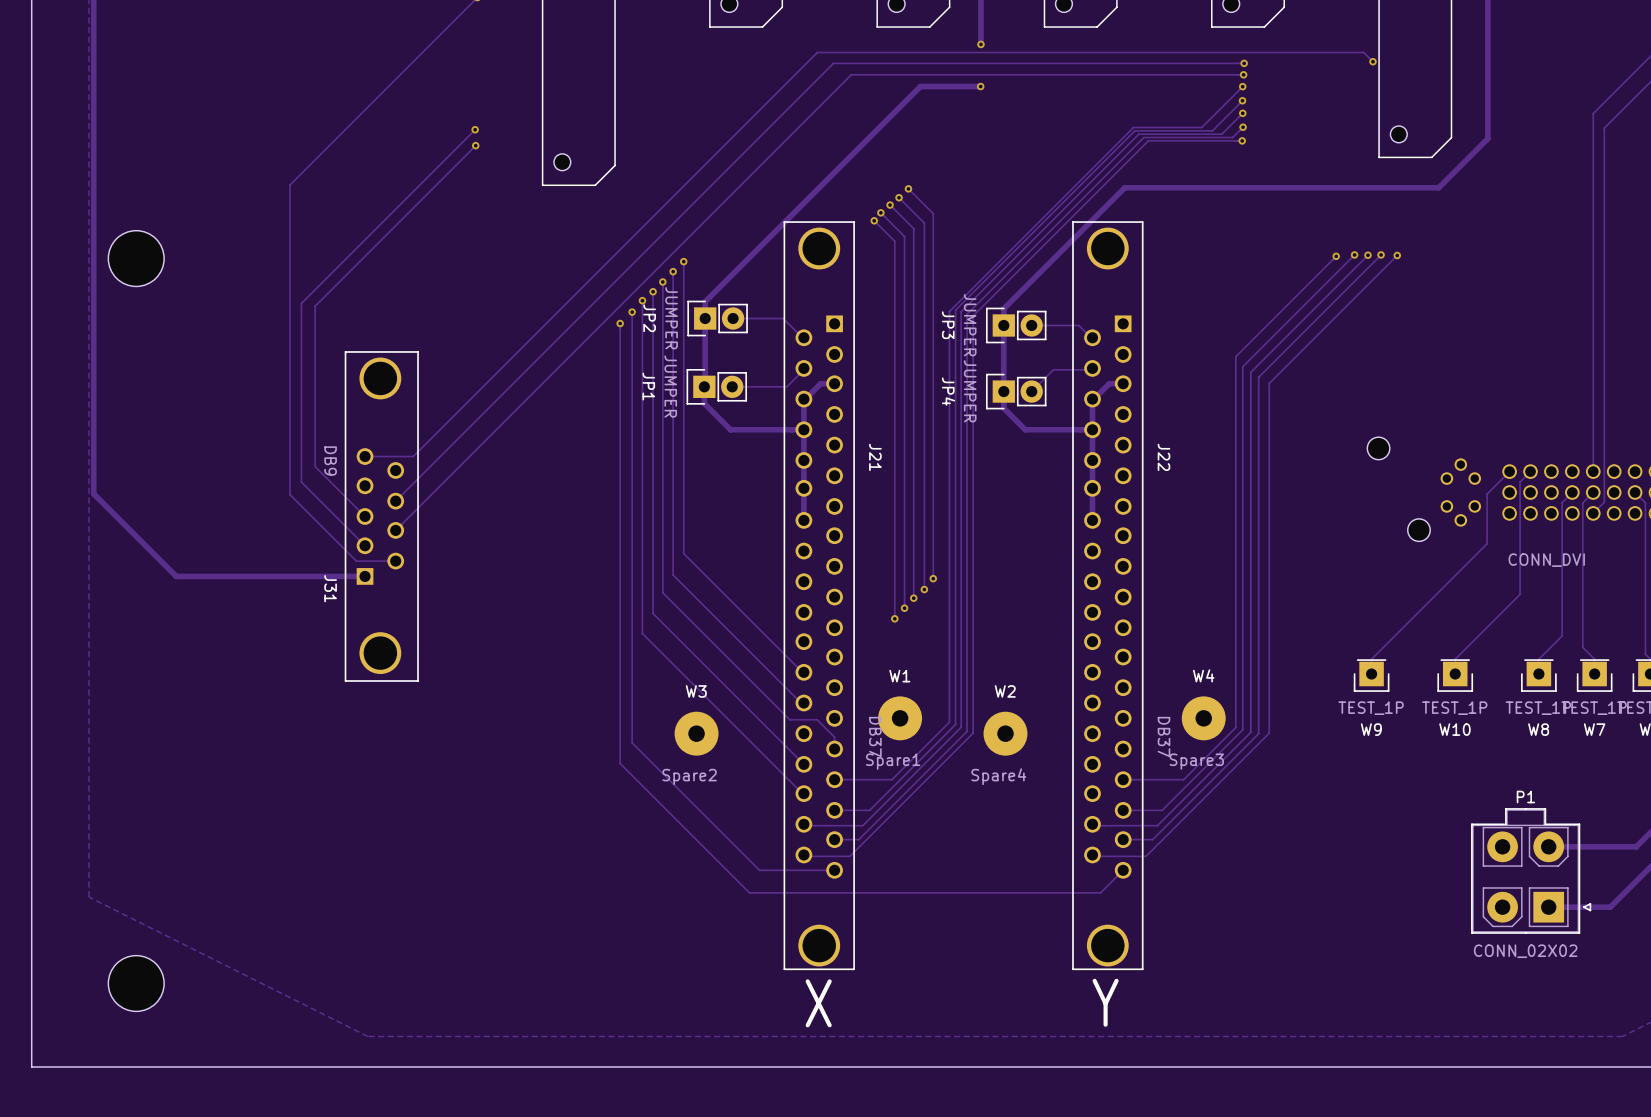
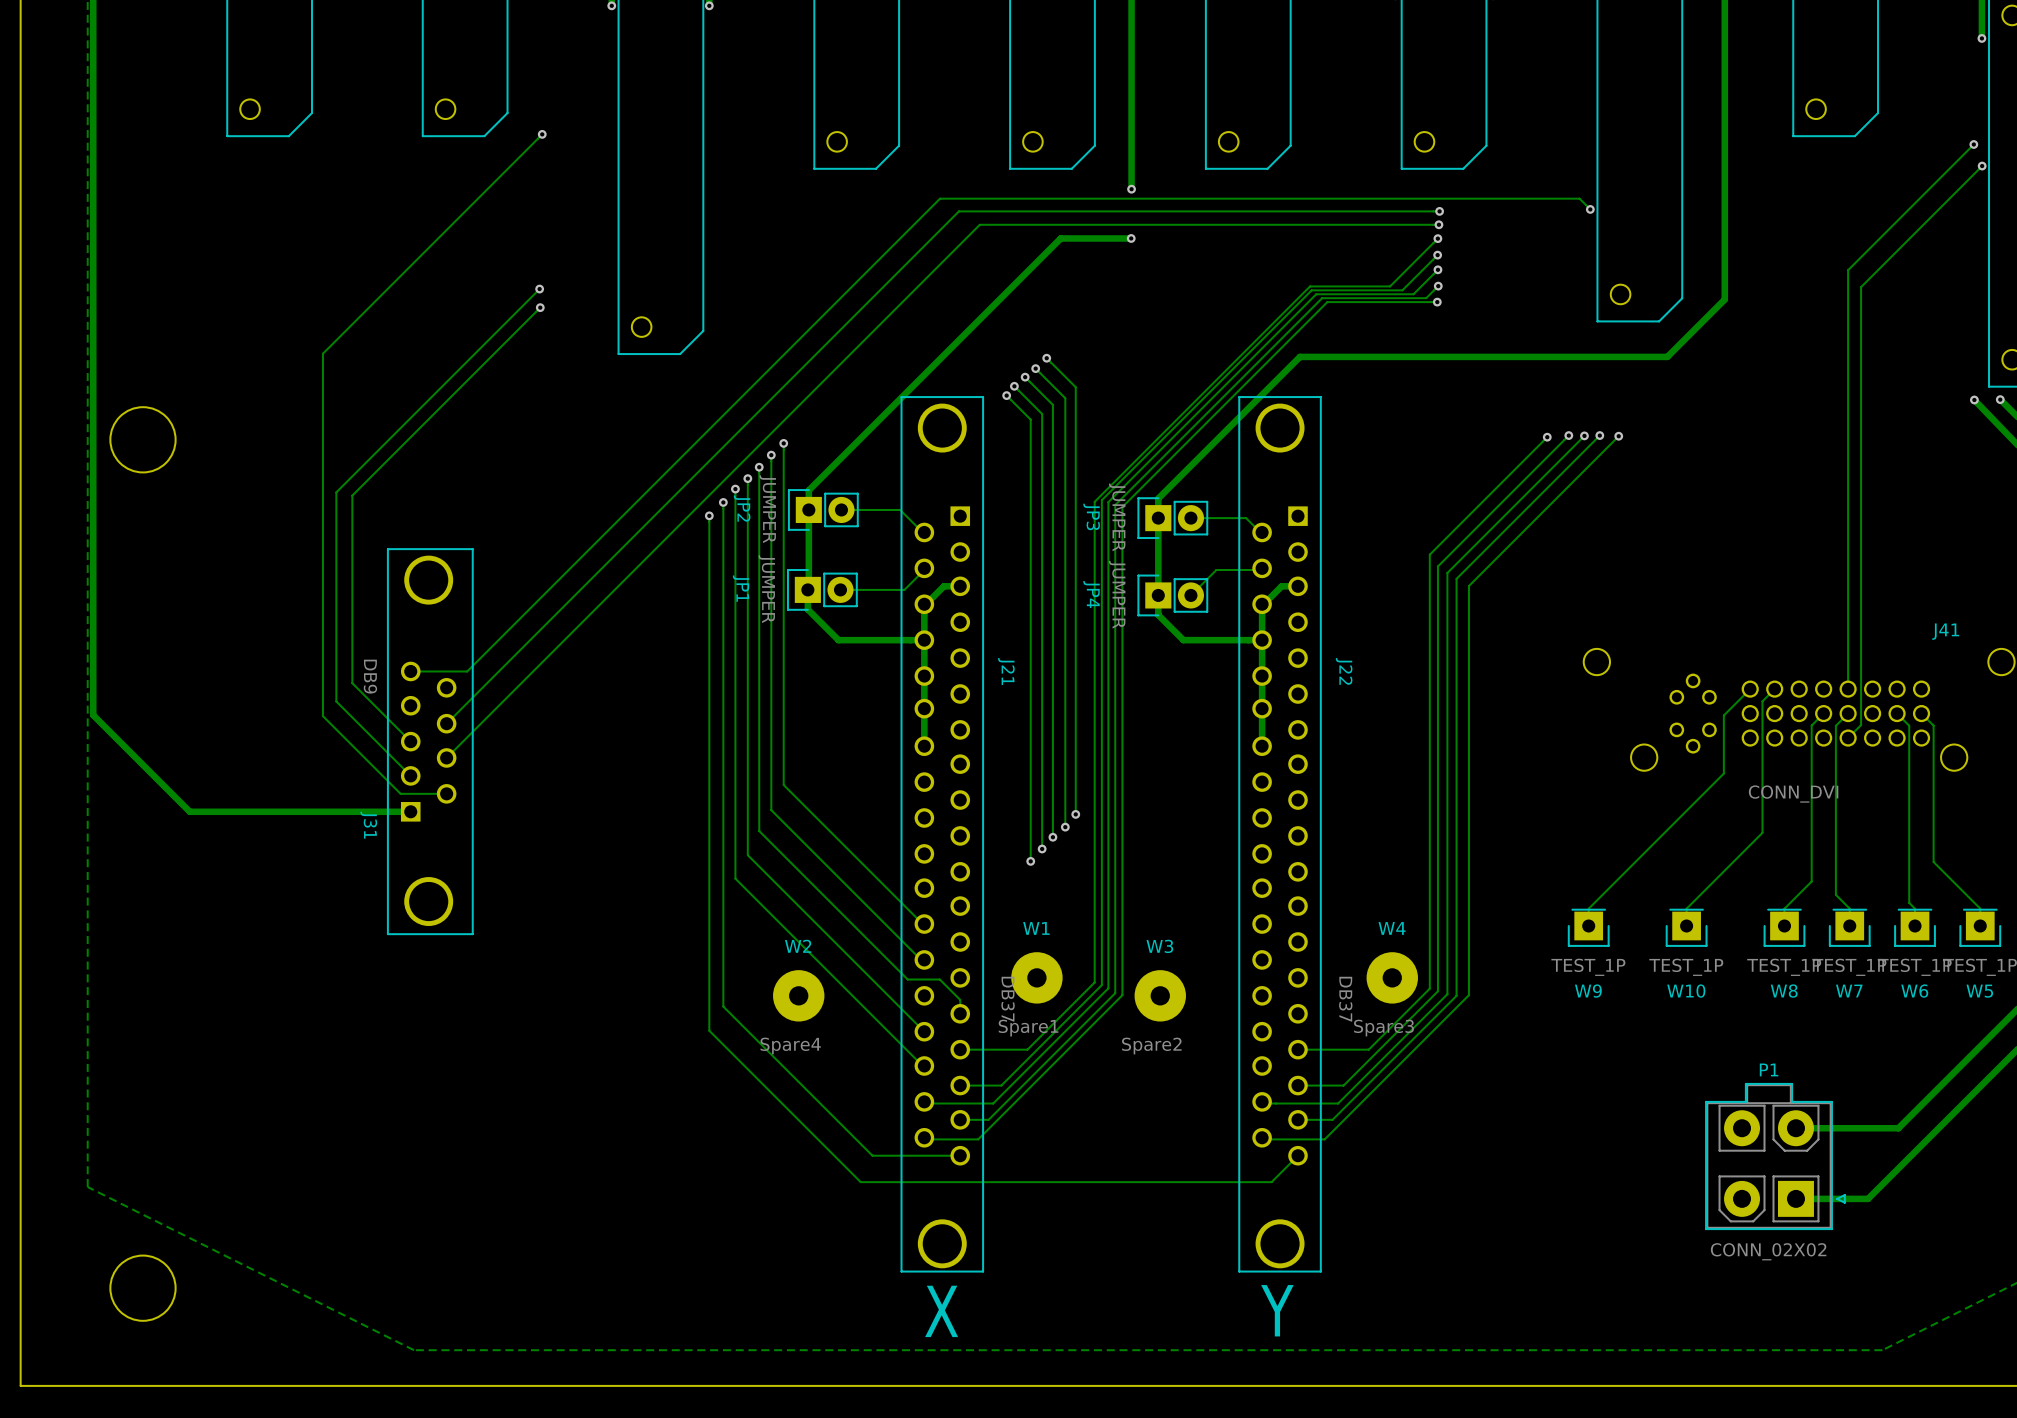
W3 name: W3 (696, 691) -> W2 (798, 946)
W2 name: W2 (1005, 691) -> W3 (1159, 946)
W3 value: Spare2 (689, 776) -> Spare4 (790, 1046)
W2 value: Spare4 (998, 776) -> Spare2 (1151, 1046)

